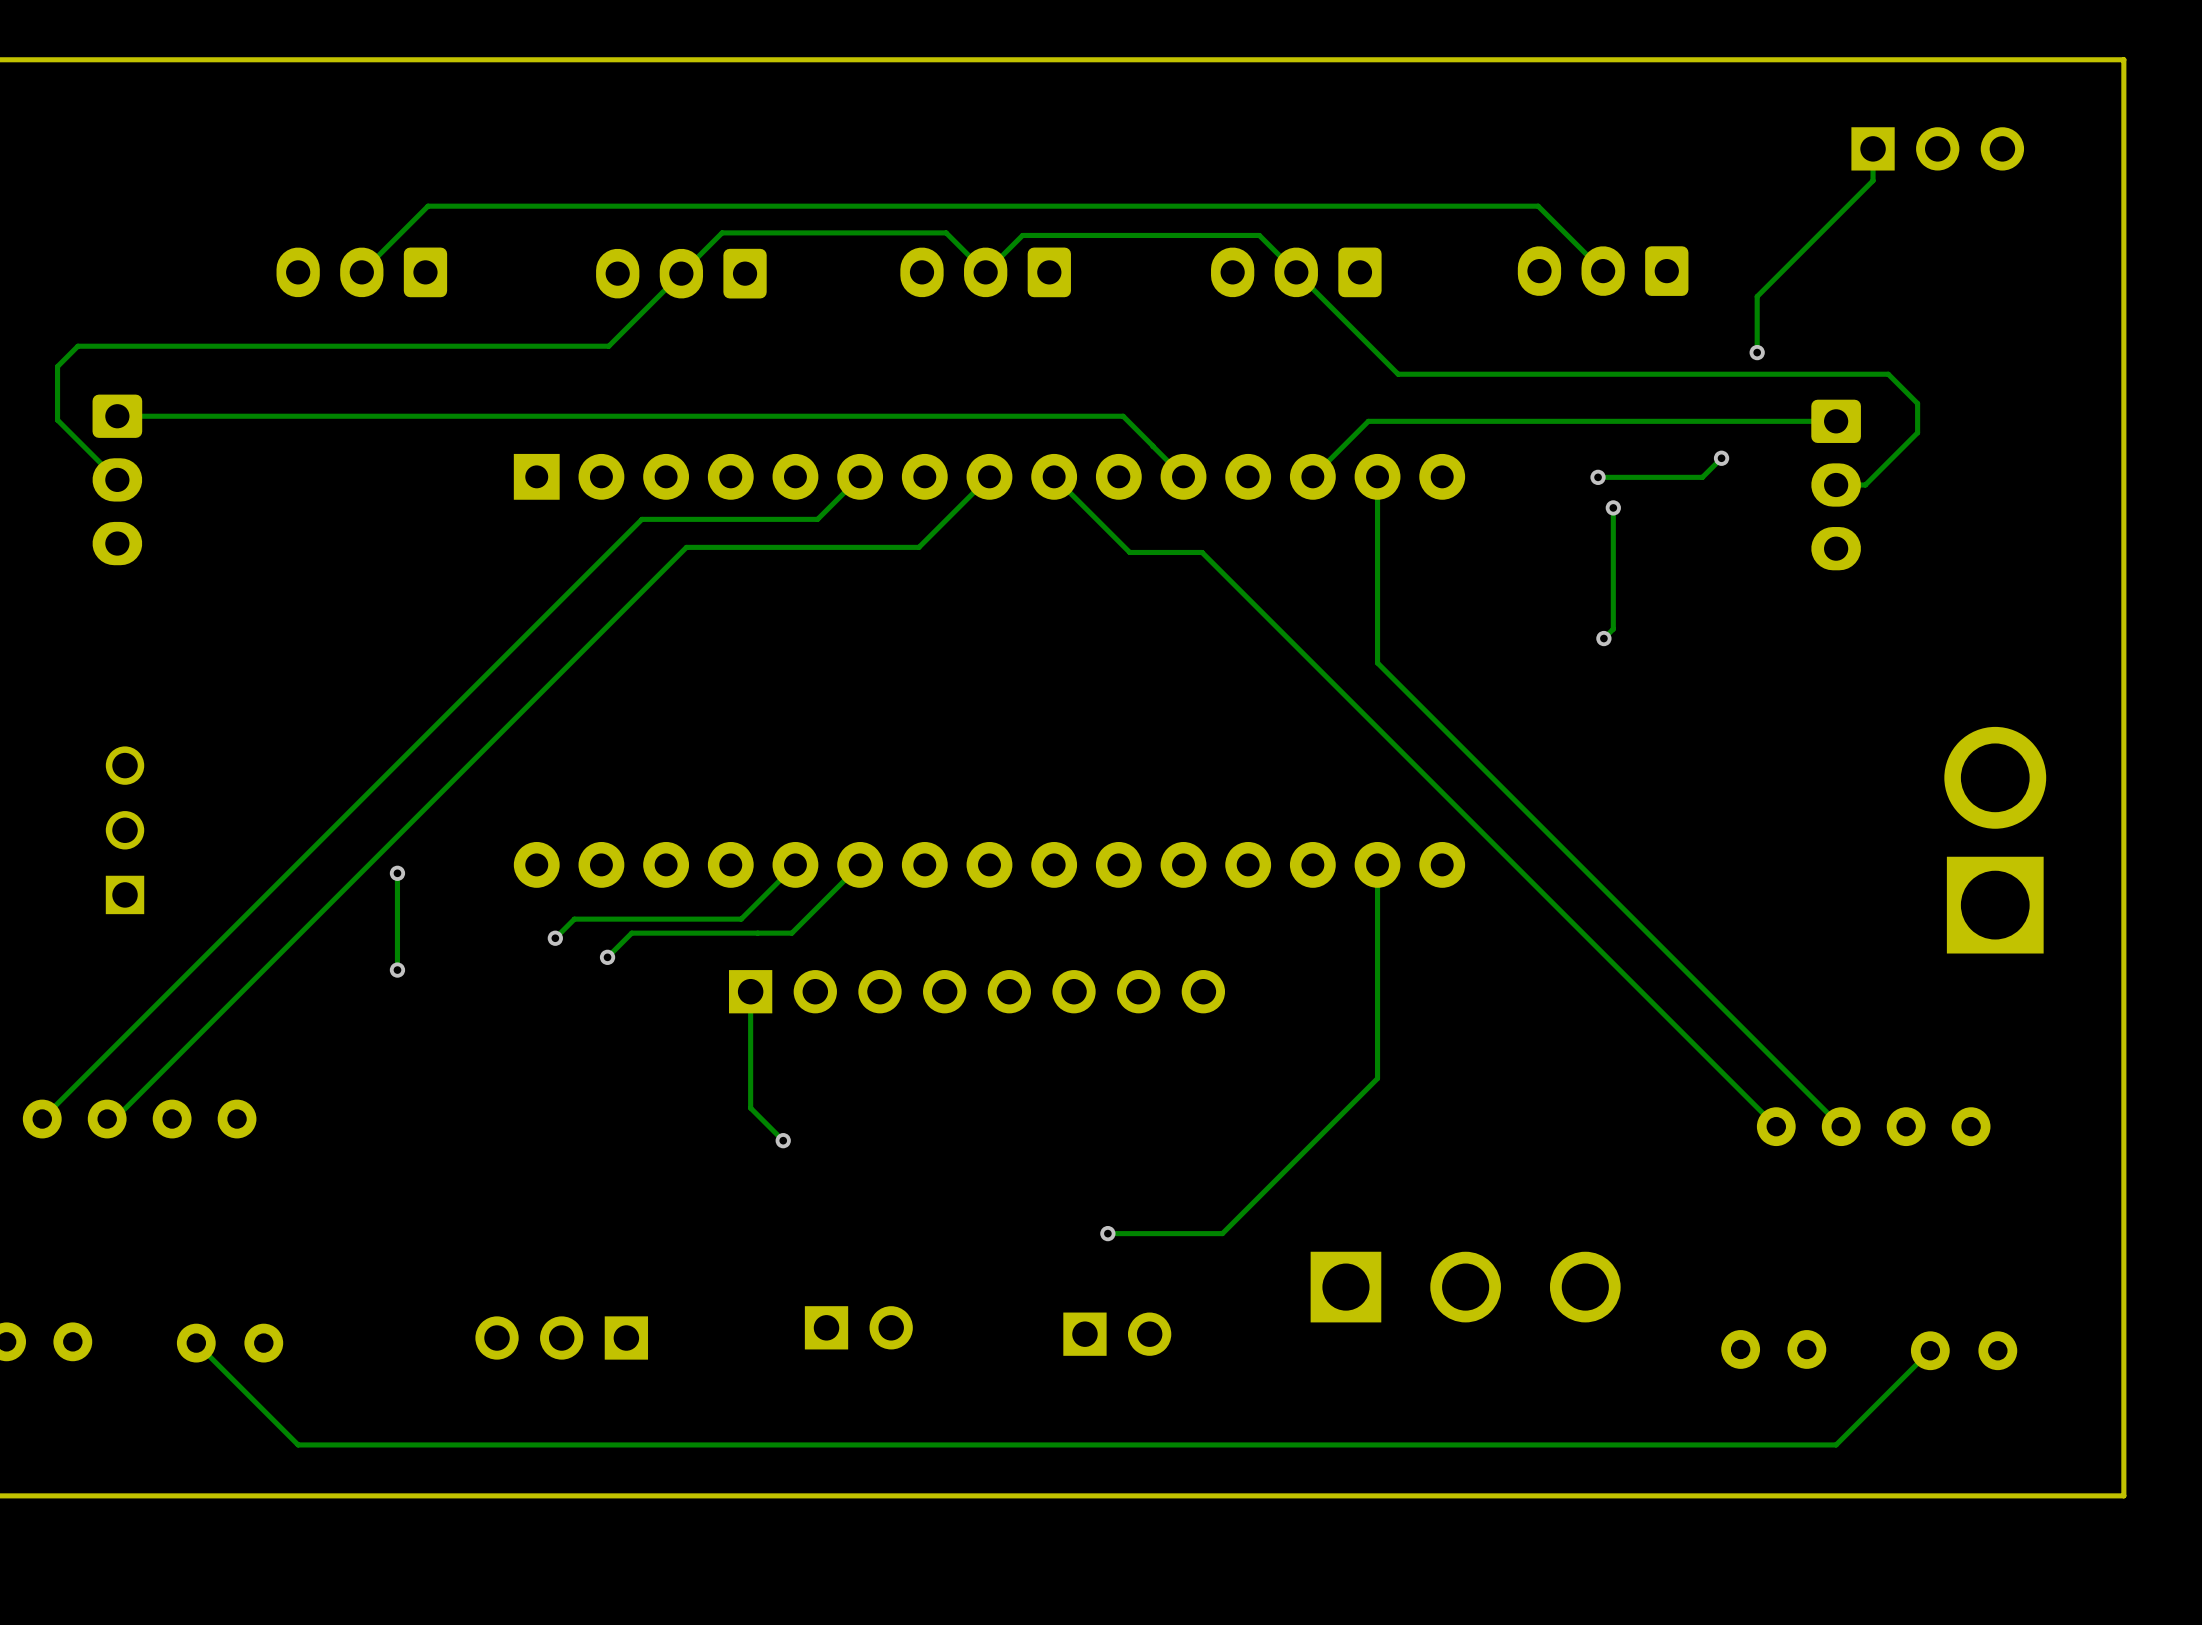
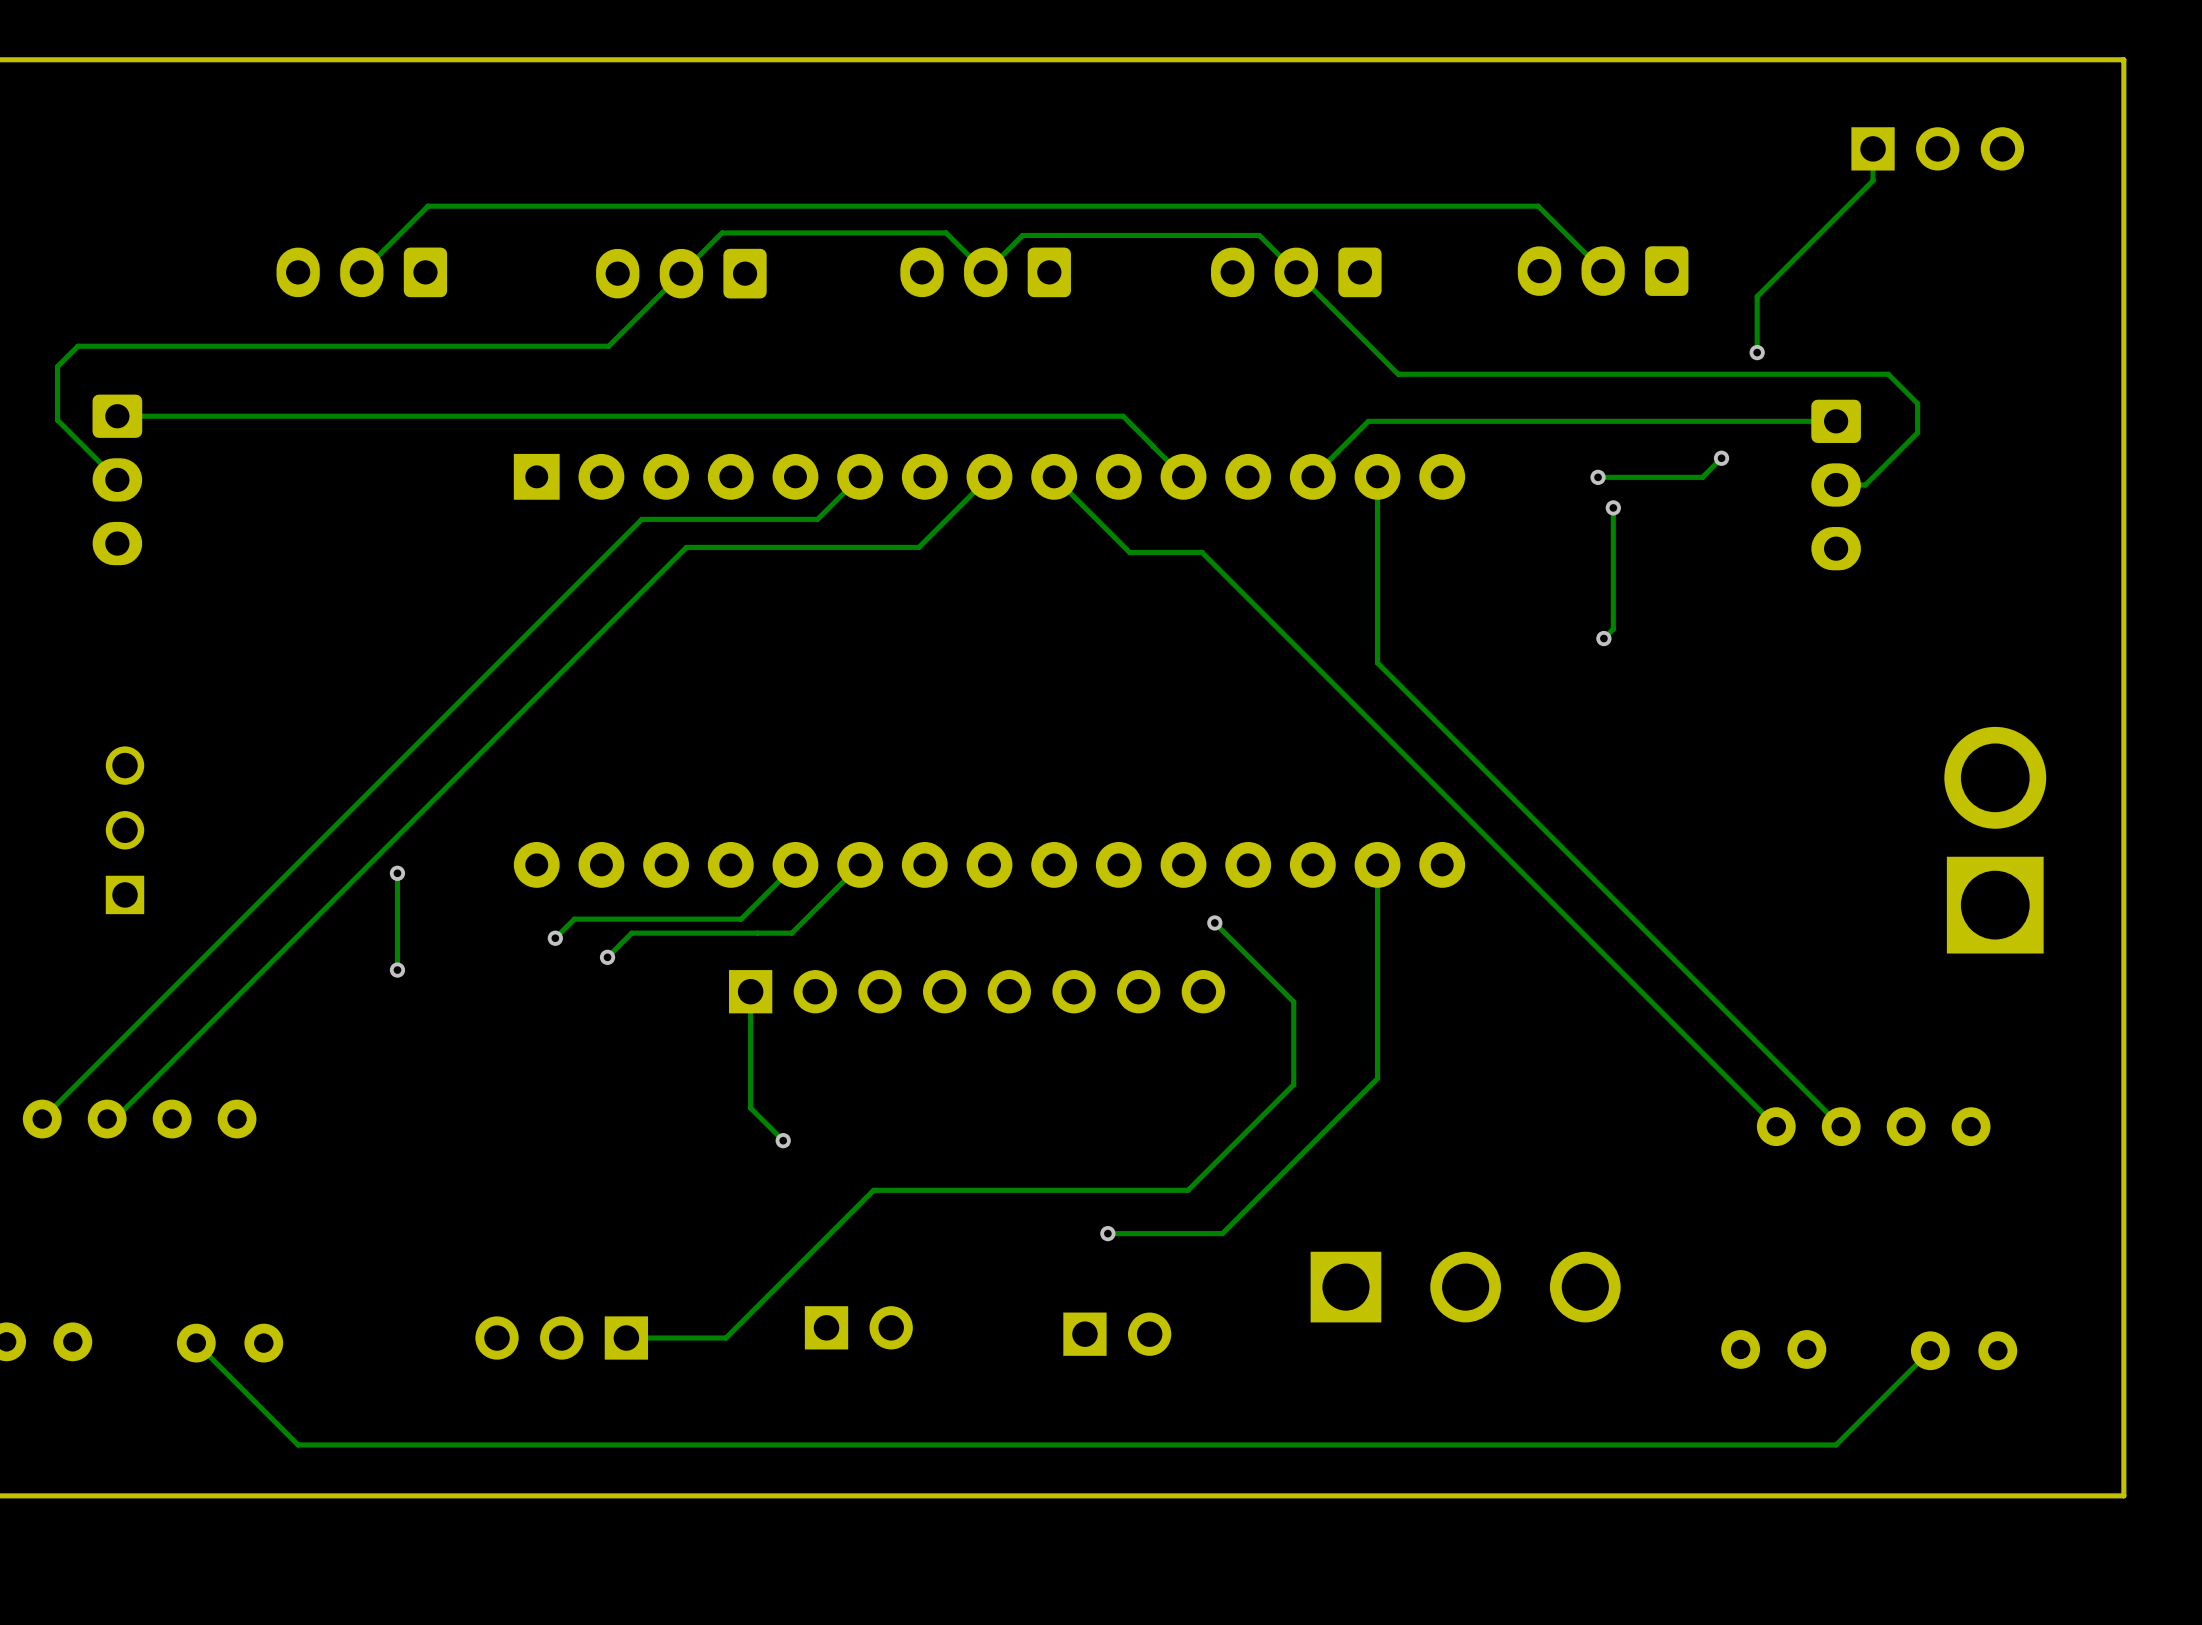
track: none -> (1214, 922) (1293, 1001) (1293, 1084) (1188, 1190) (873, 1190) (725, 1338) (626, 1338)
via: none -> (1214, 922)

